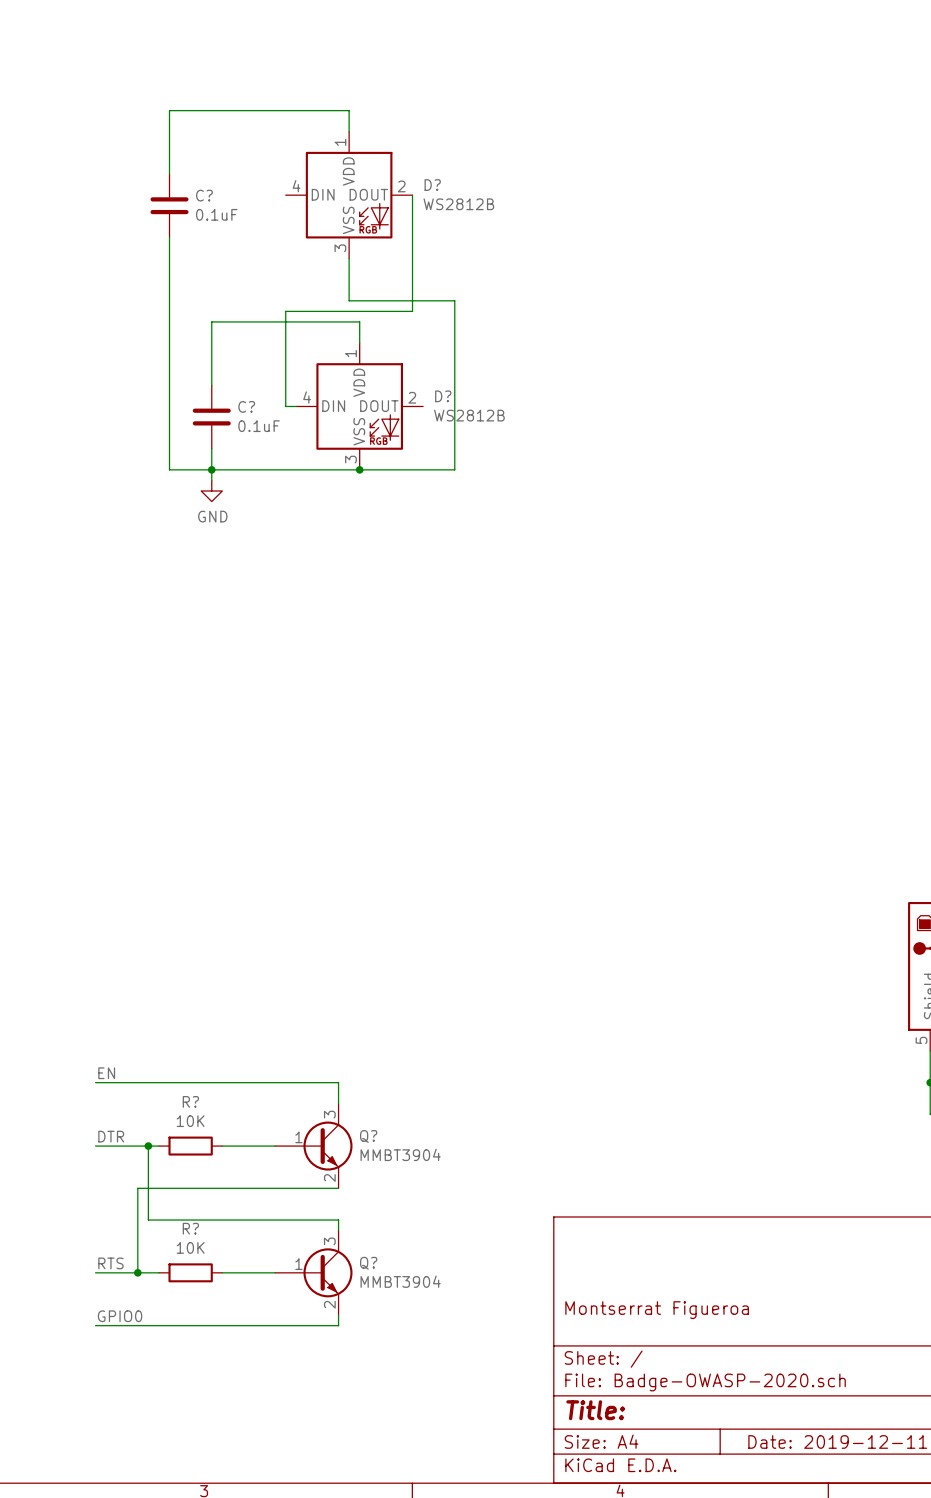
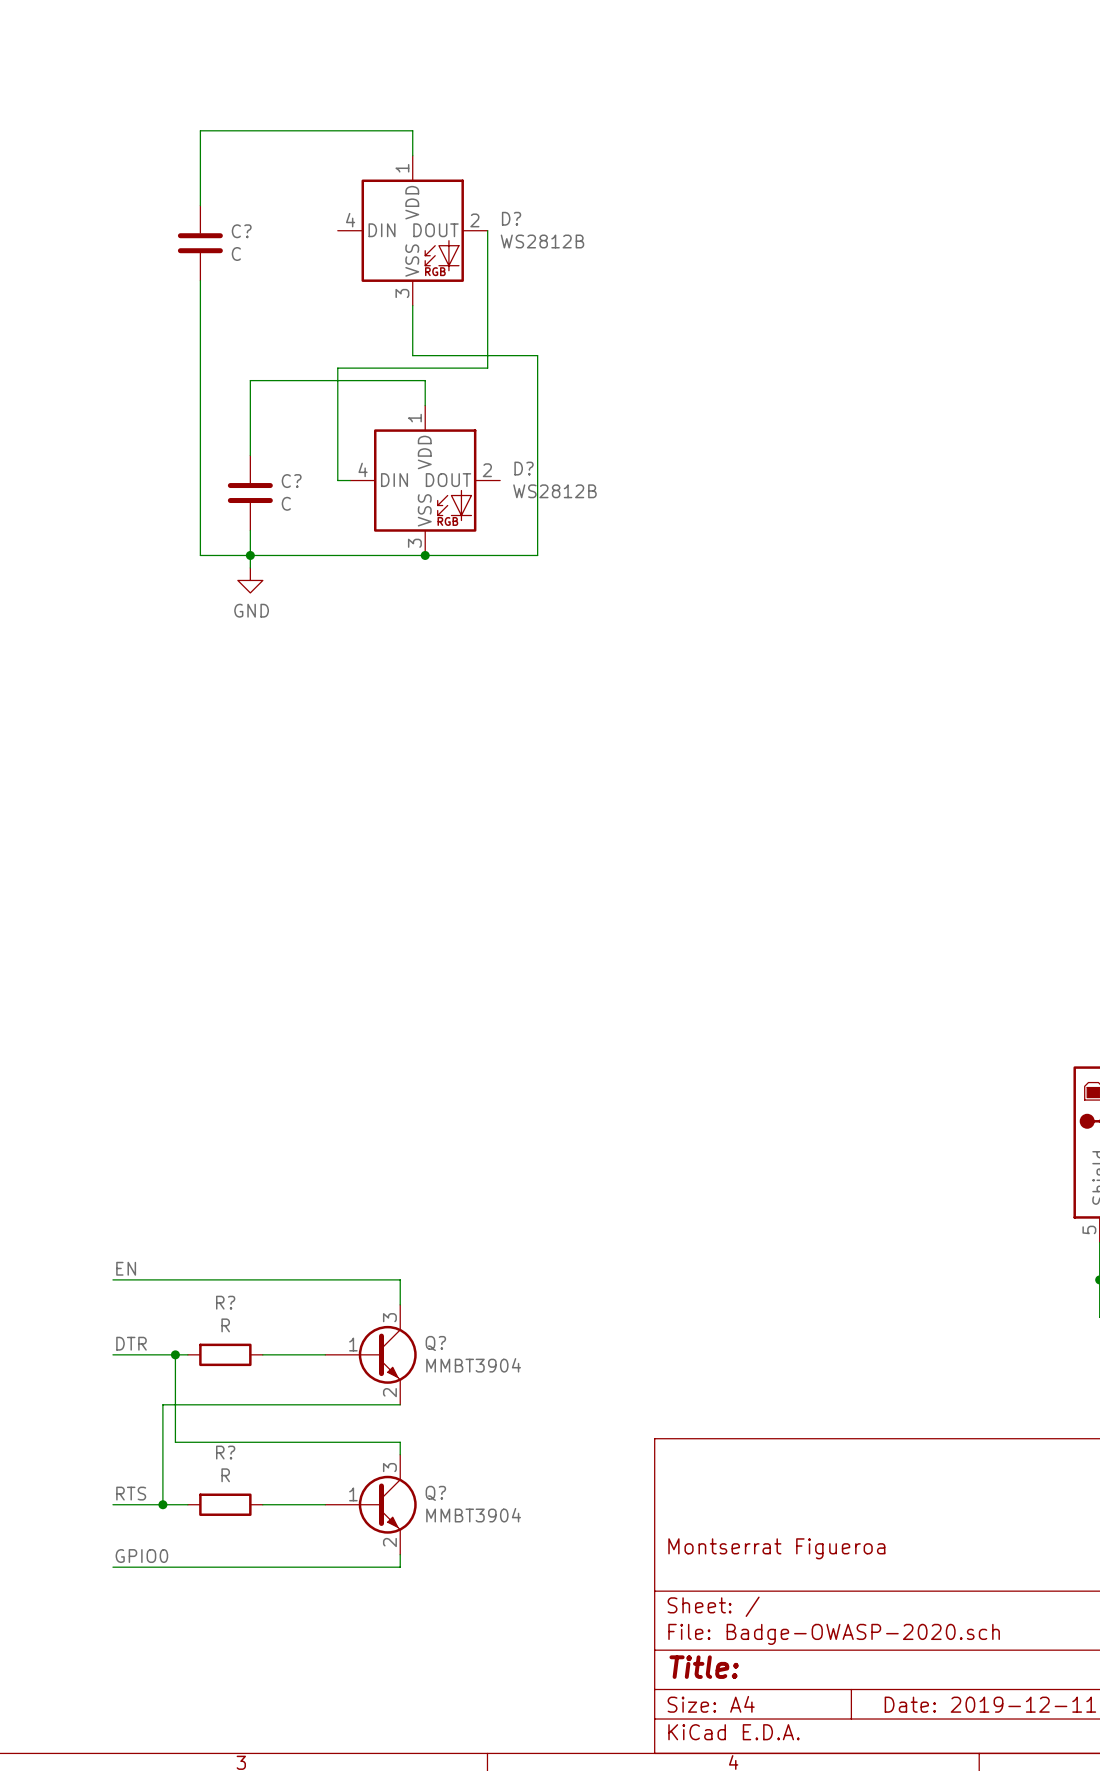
C? value: 0.1uF (216, 214) -> C (236, 253)
C? value: 0.1uF (259, 426) -> C (286, 503)
R? value: 10K (190, 1121) -> R (225, 1325)
R? value: 10K (190, 1247) -> R (225, 1475)

